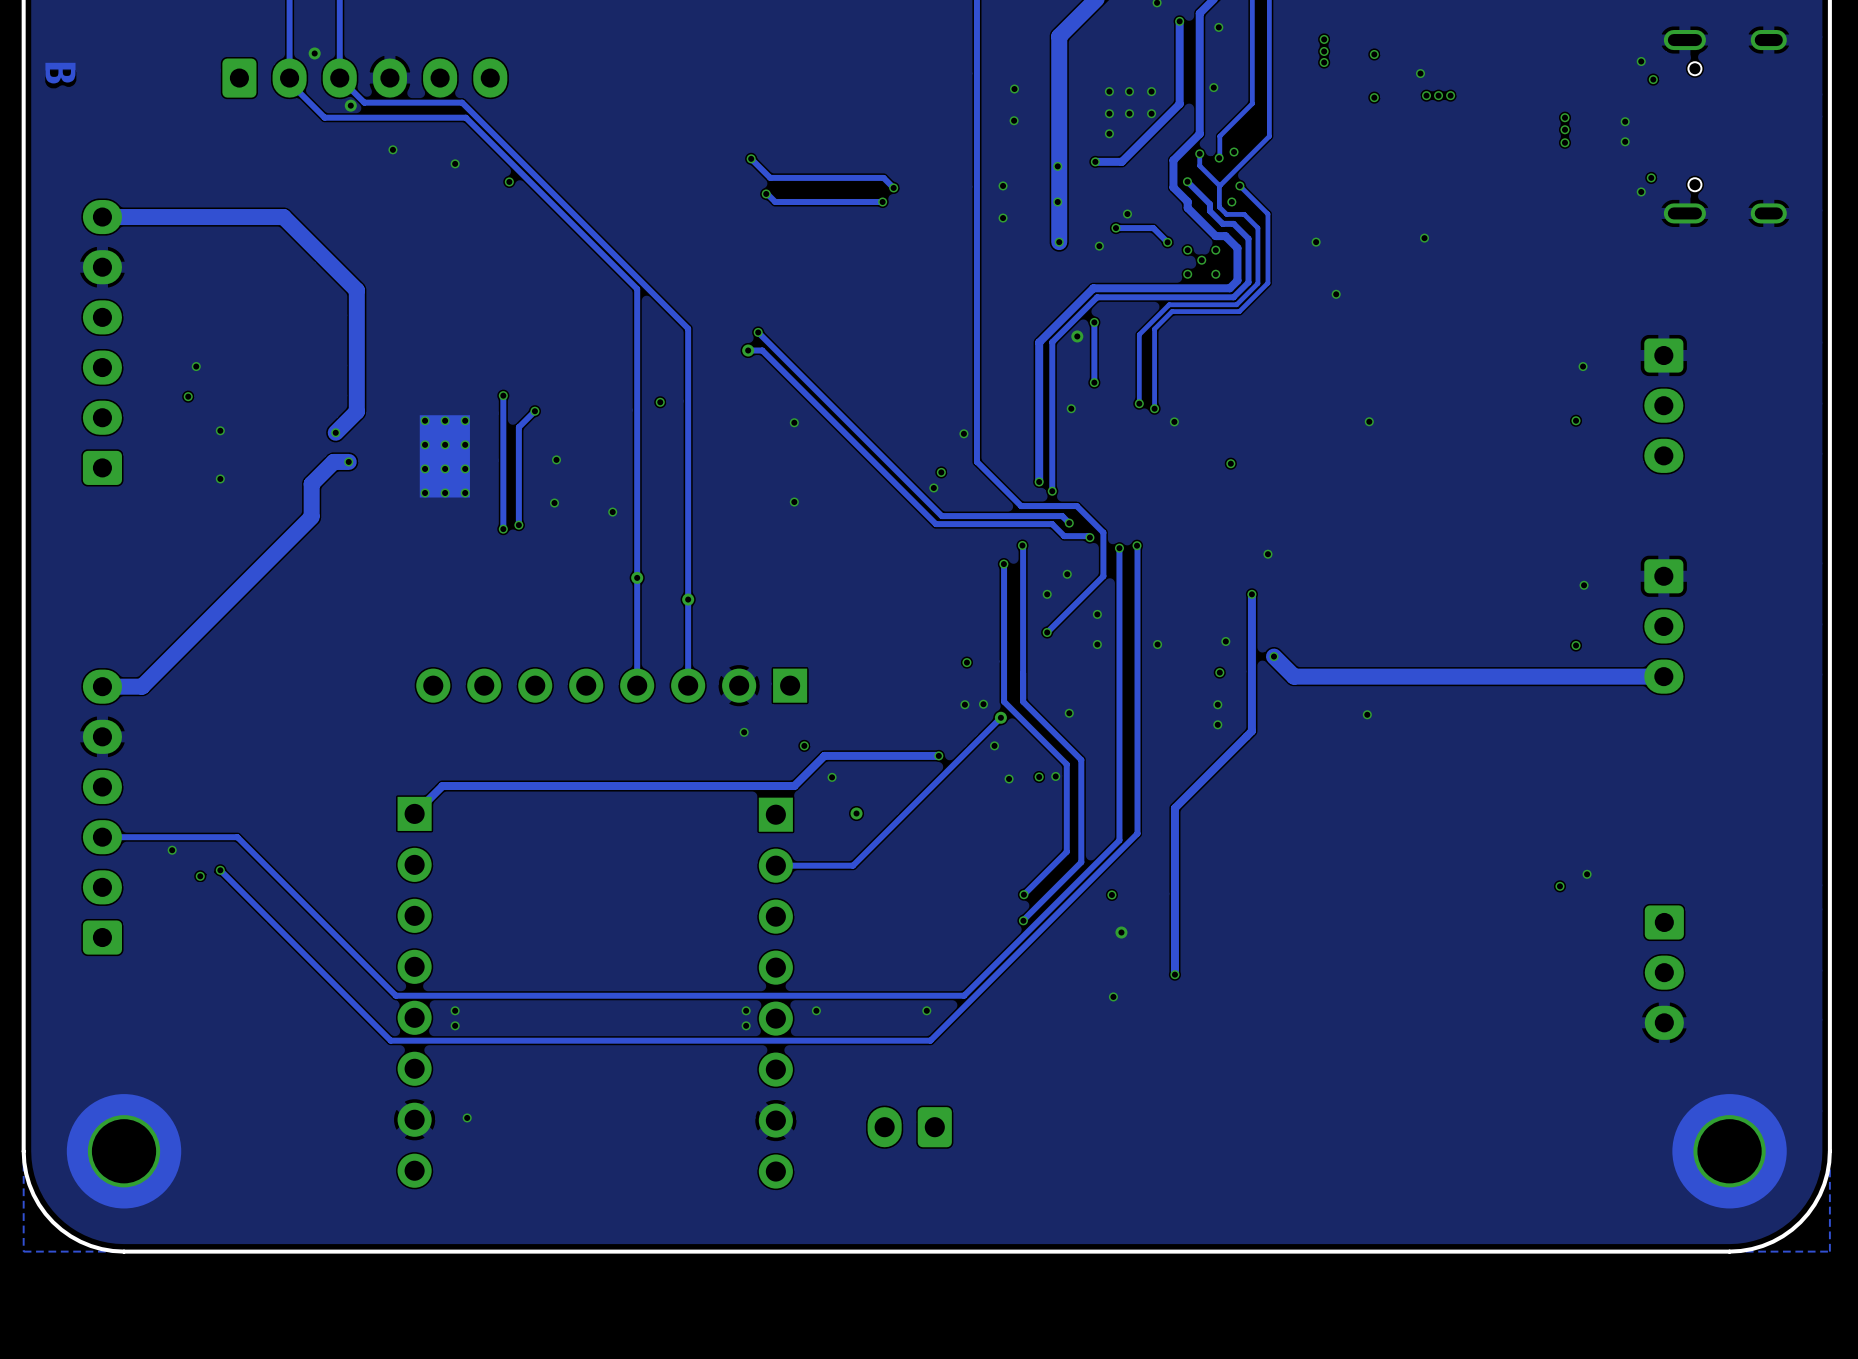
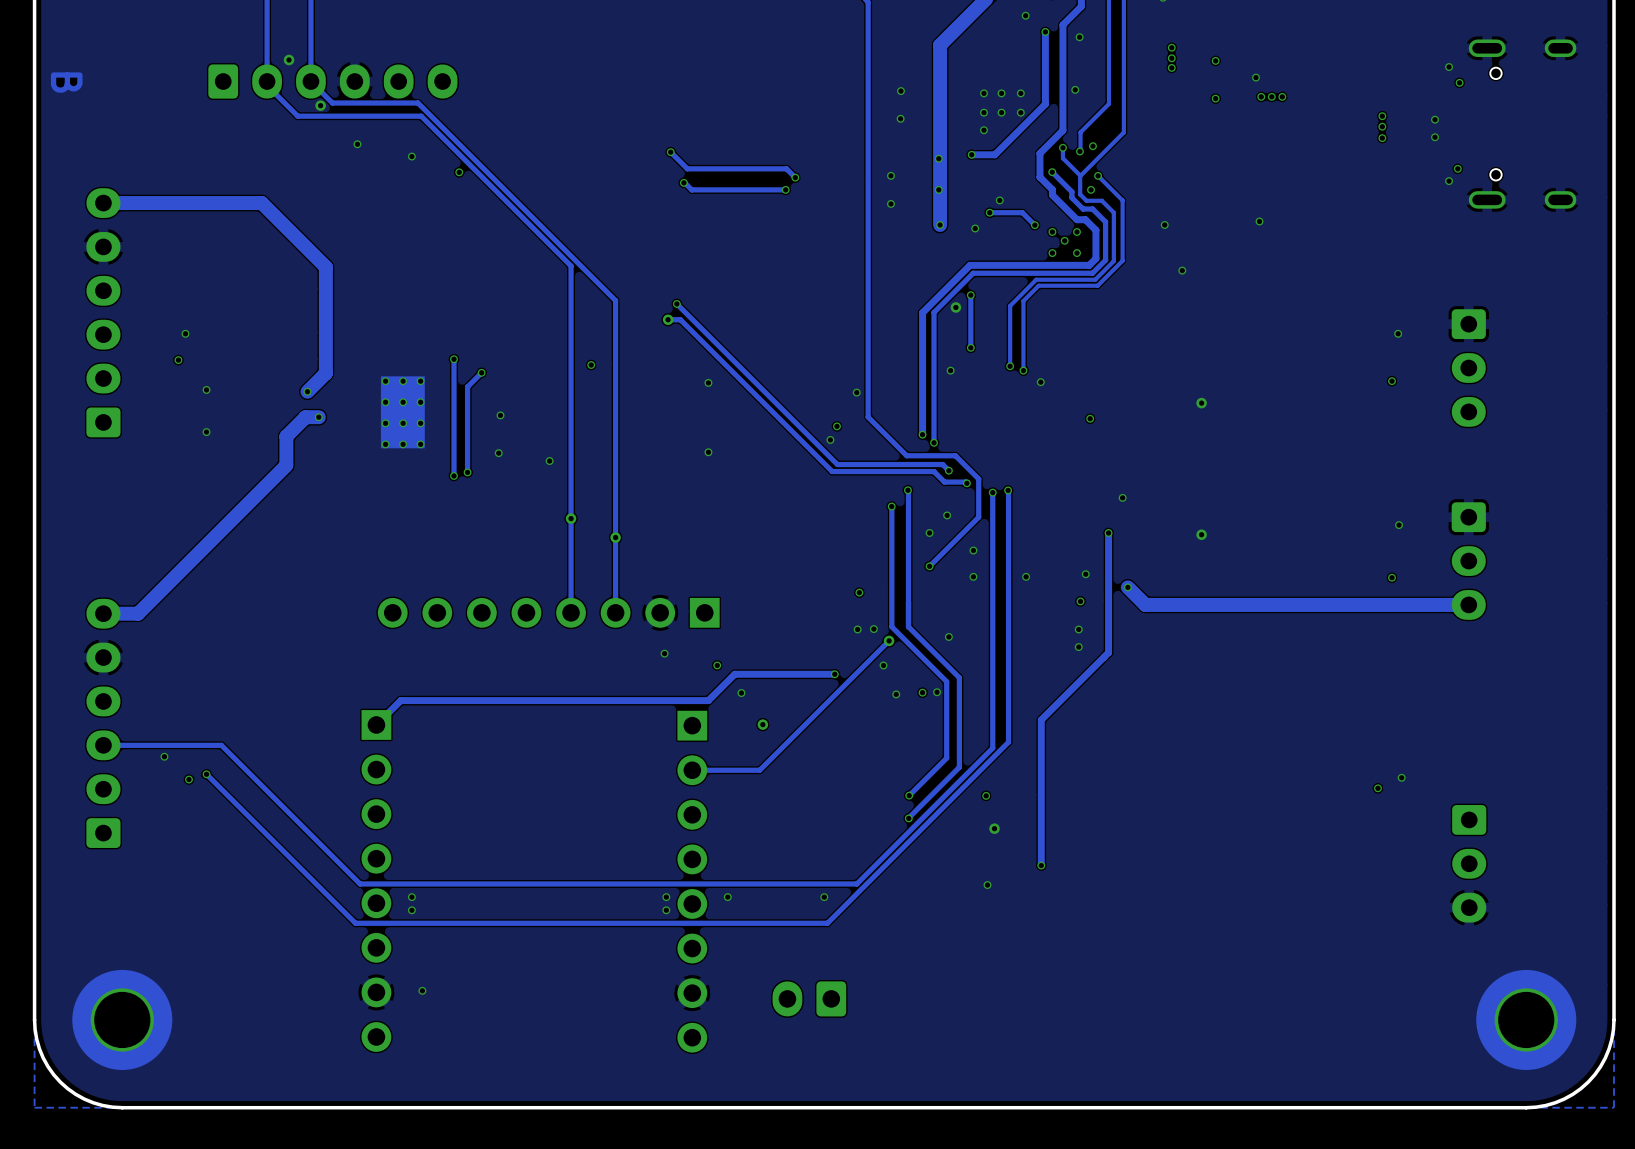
via: (1369, 421) -> none
via: none -> (1201, 403)
via: none -> (1201, 534)
via: (1367, 714) -> none

